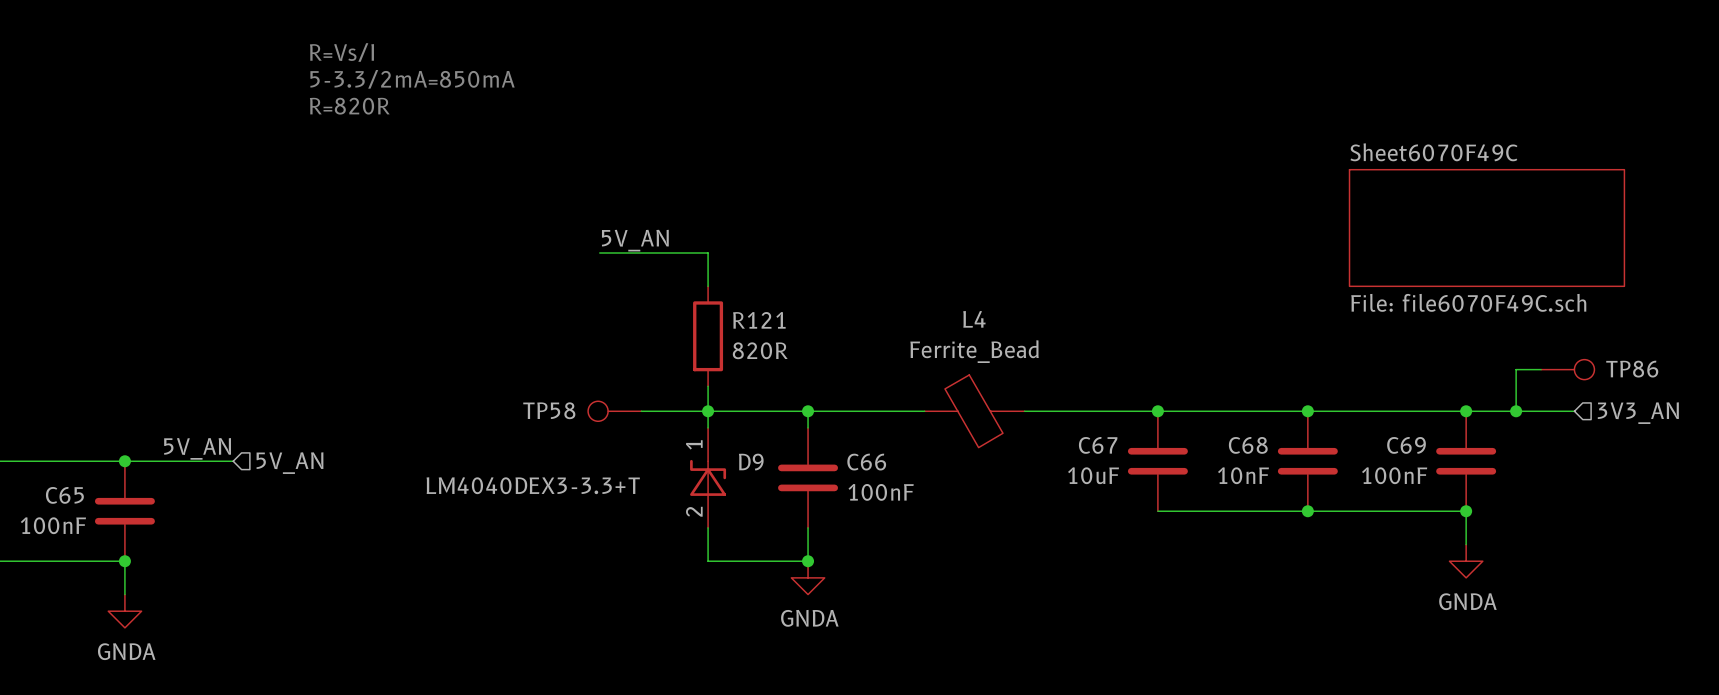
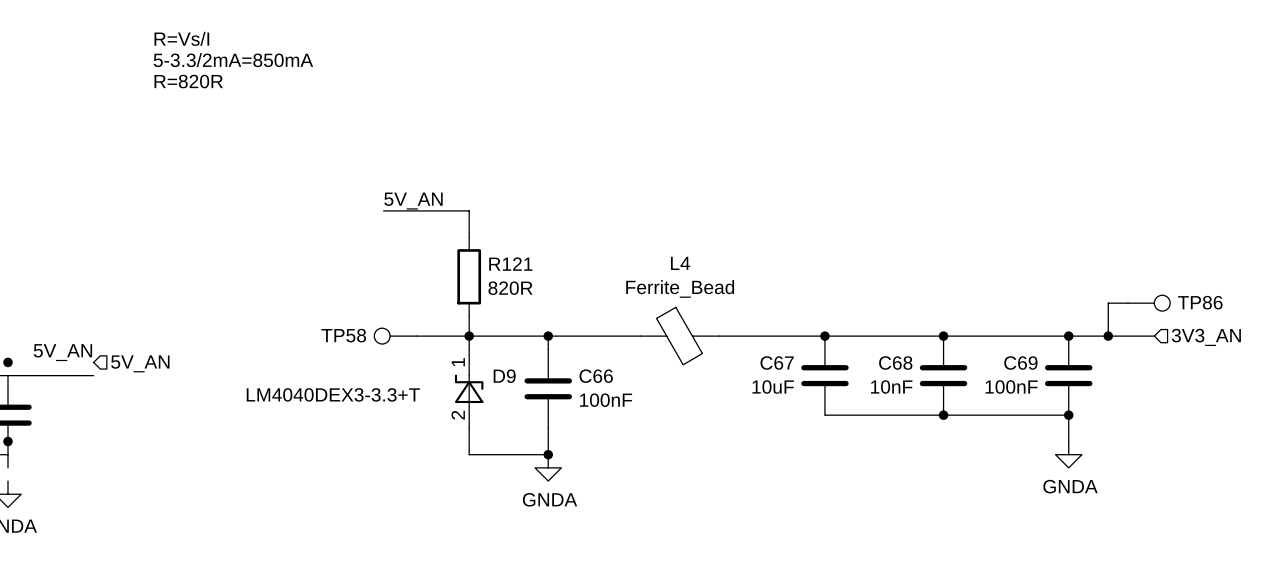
text position: R=Vs/I (341, 52) -> R=Vs/I (181, 38)
text position: 5-3.3/2mA=850mA (412, 79) -> 5-3.3/2mA=850mA (233, 60)
text position: R=820R (349, 106) -> R=820R (188, 81)
sheet Sheet6070F49C: File: file6070F49C.sch (1486, 228) -> none
label position: 5V_AN (197, 448) -> 5V_AN (62, 352)
junction position: (124, 461) -> (8, 362)
hierarchical label position: 5V_AN (289, 463) -> 5V_AN (140, 363)
junction position: (124, 561) -> (8, 441)
wire: (124, 577) (124, 594) -> none

